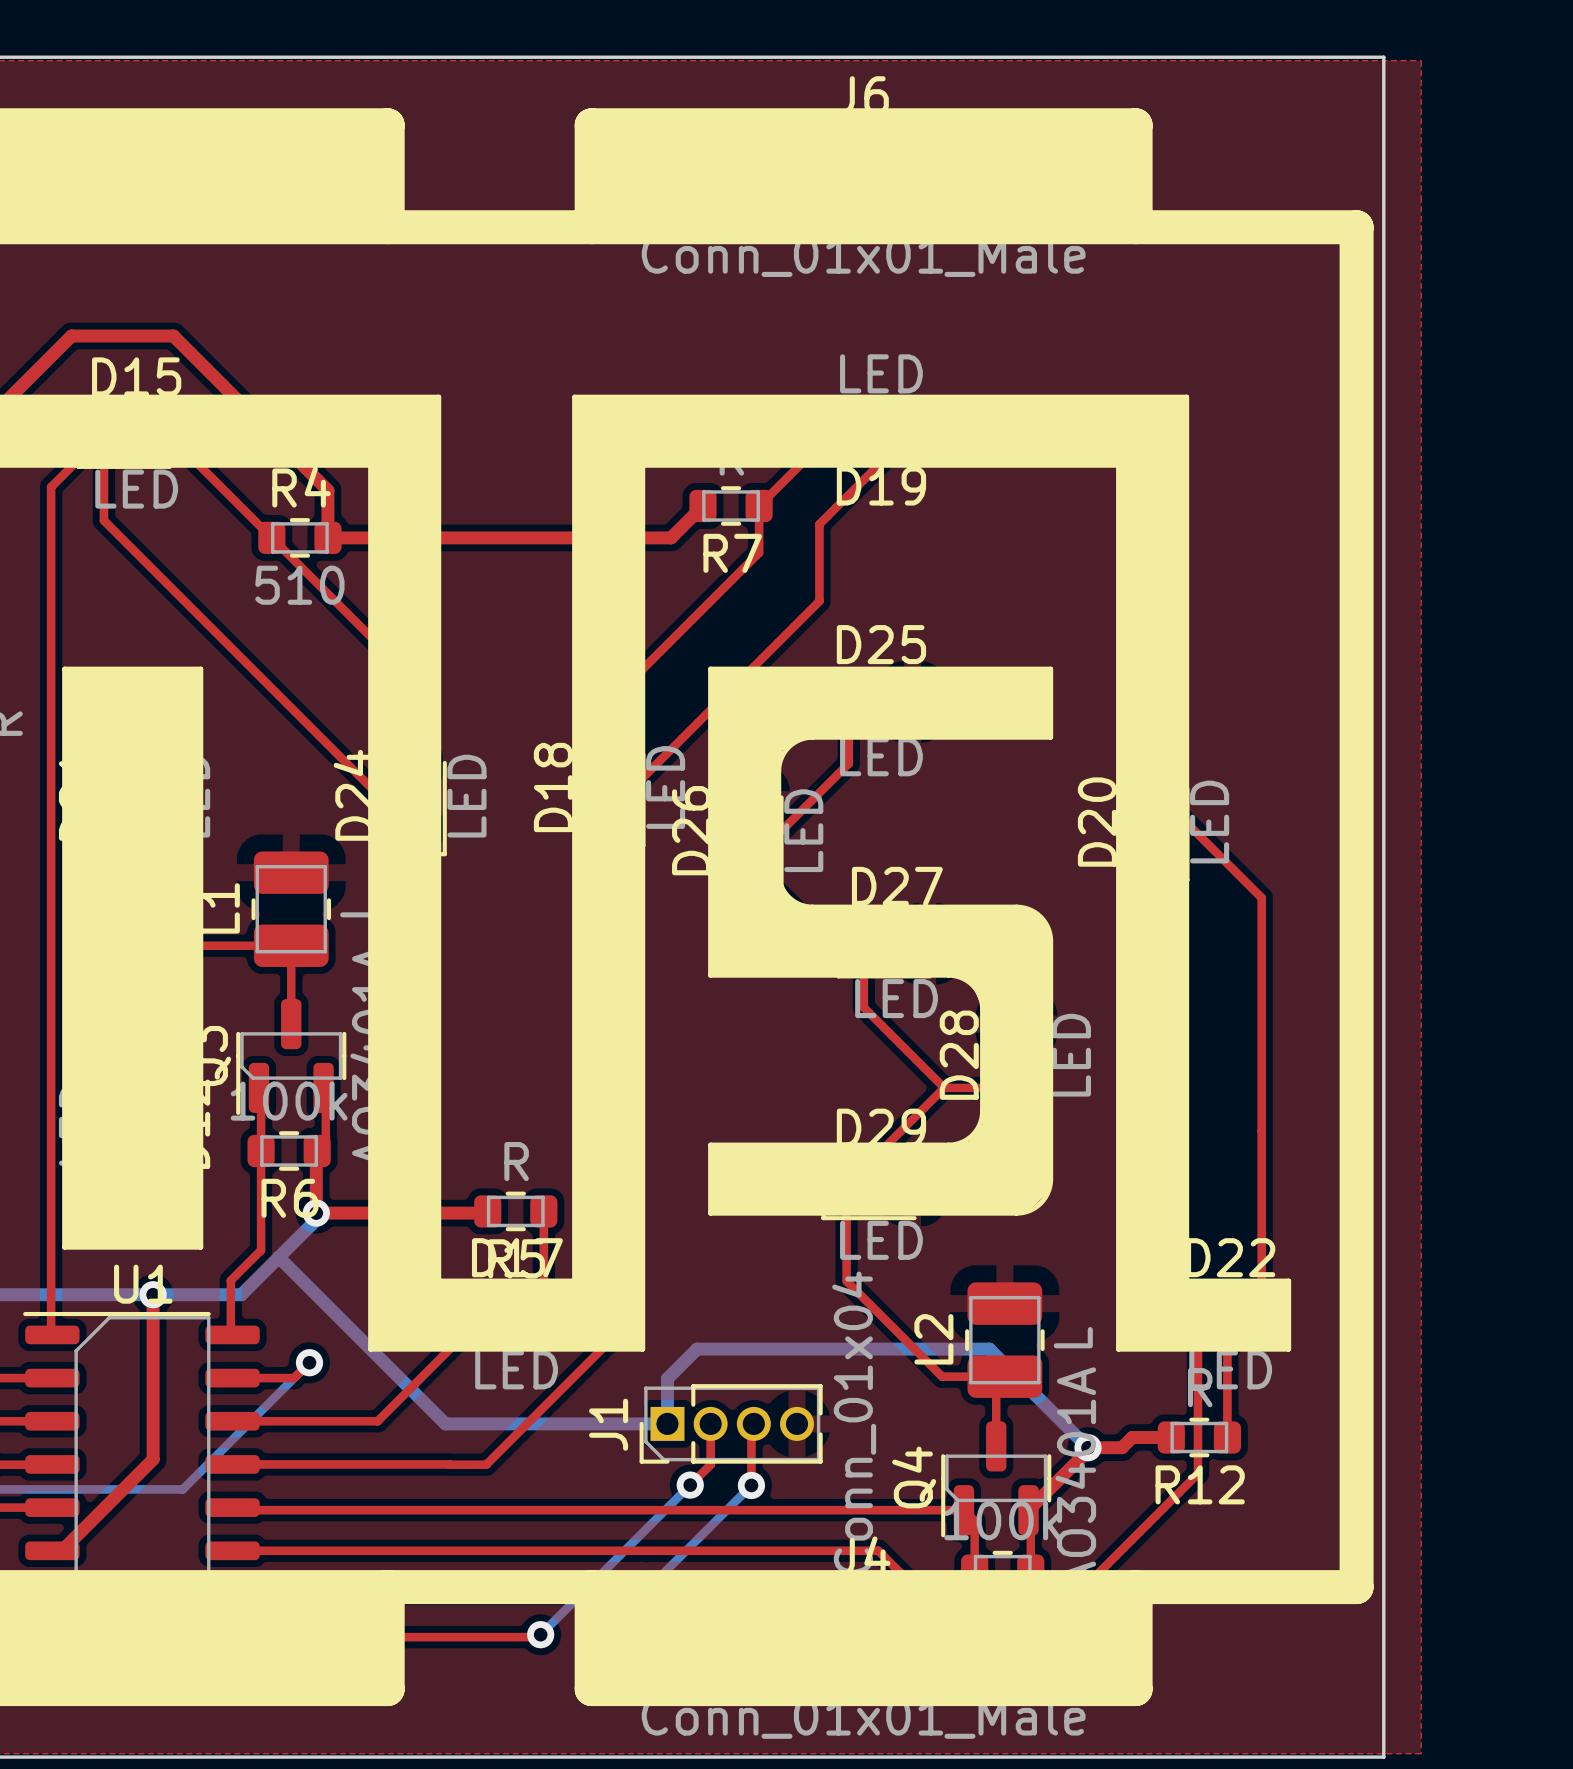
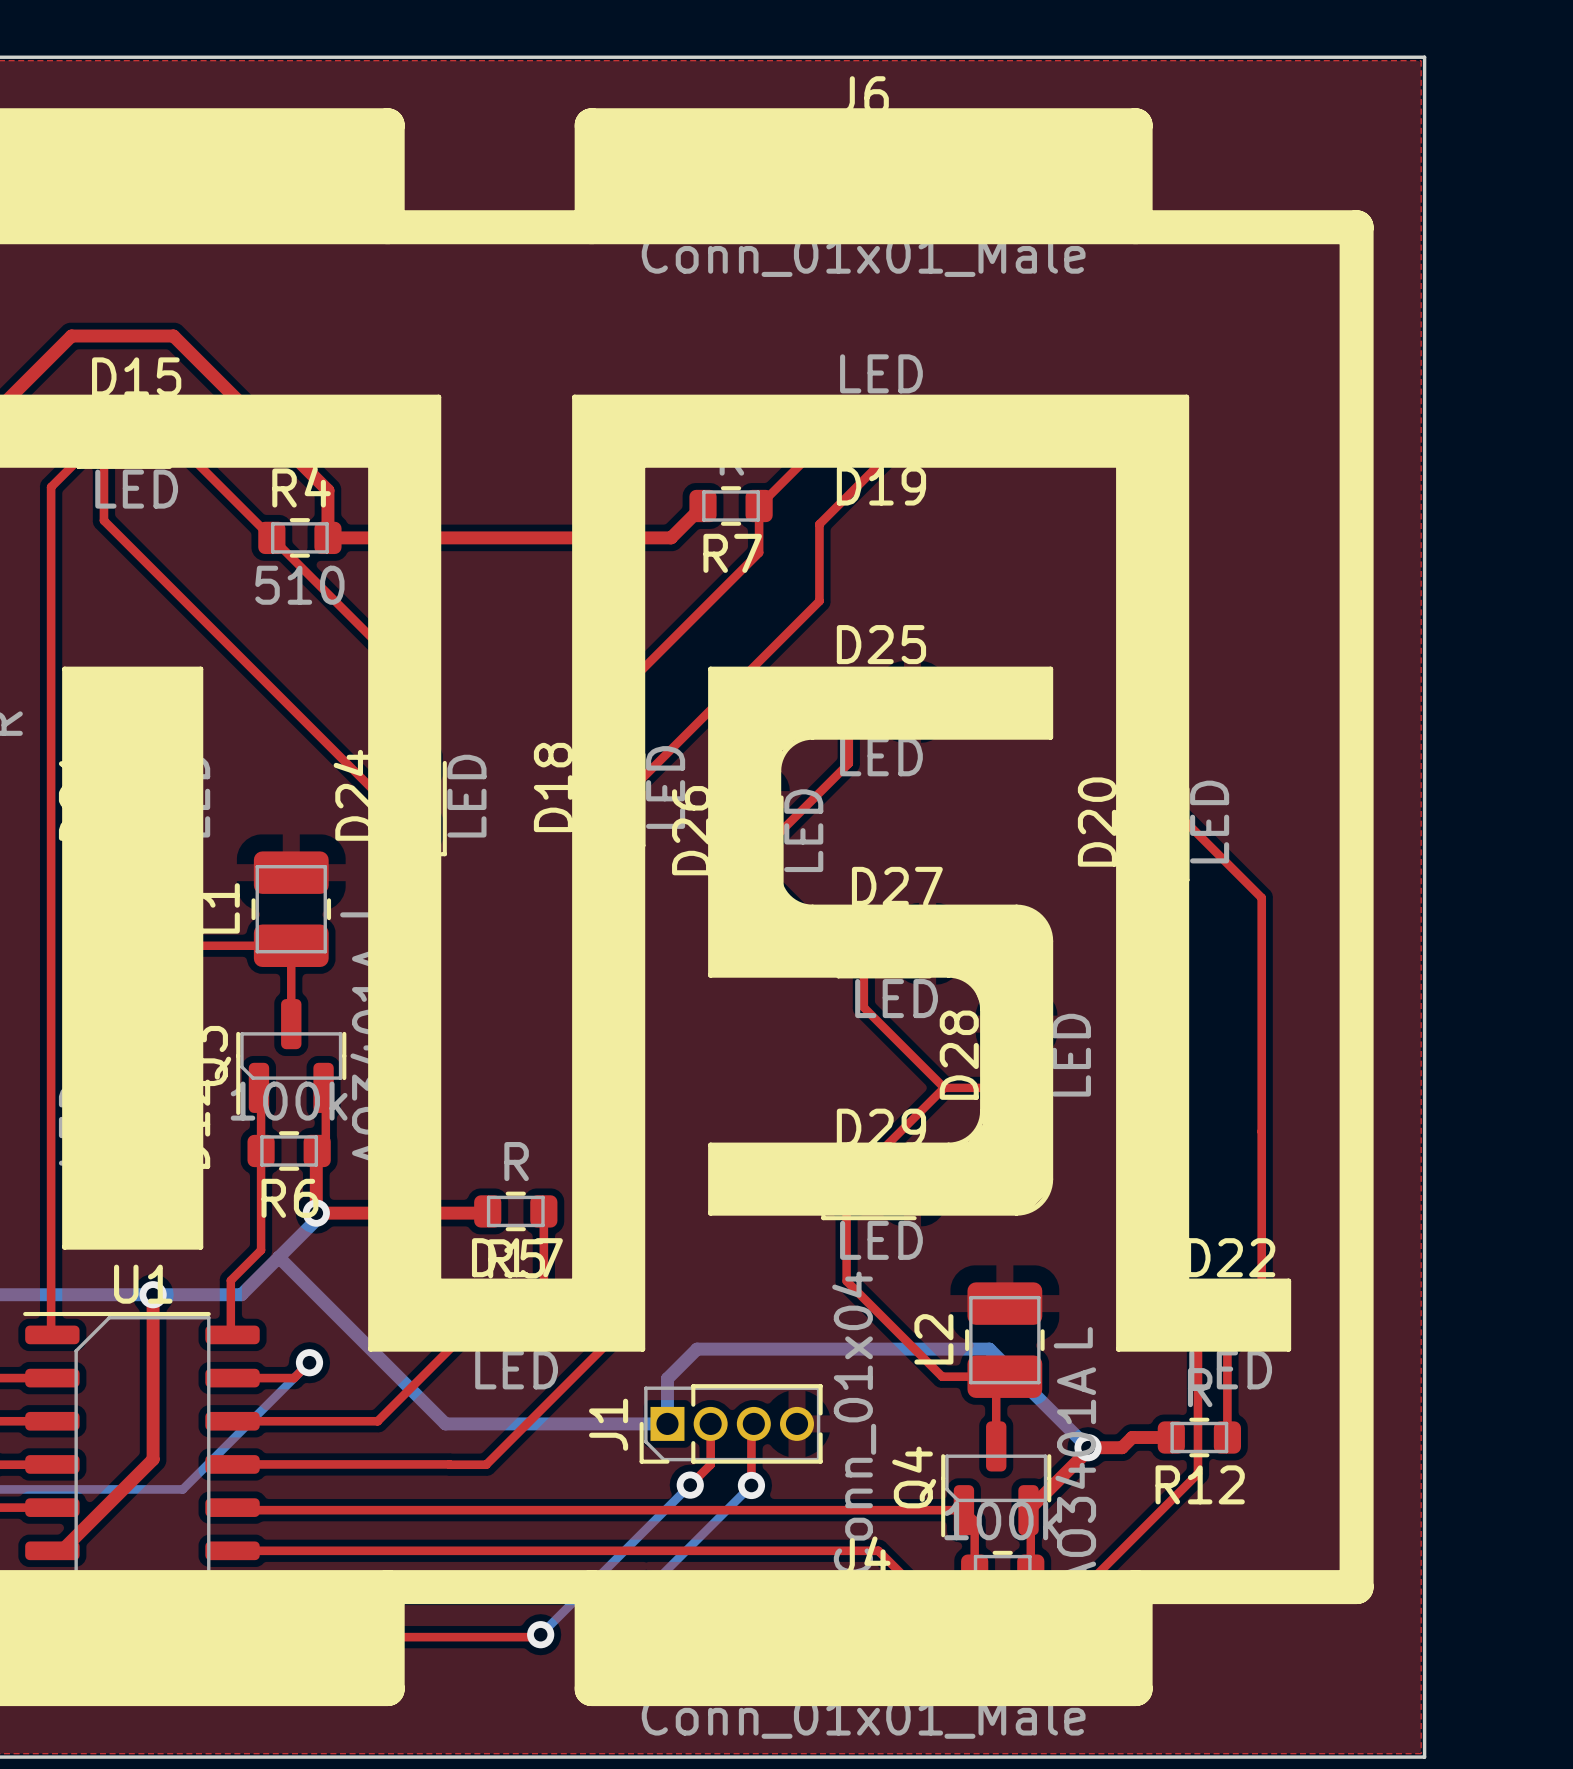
board edge: (1383, 57) (1383, 1757) -> (1383, 57) (1424, 57) (1424, 1757) (1383, 1757)

